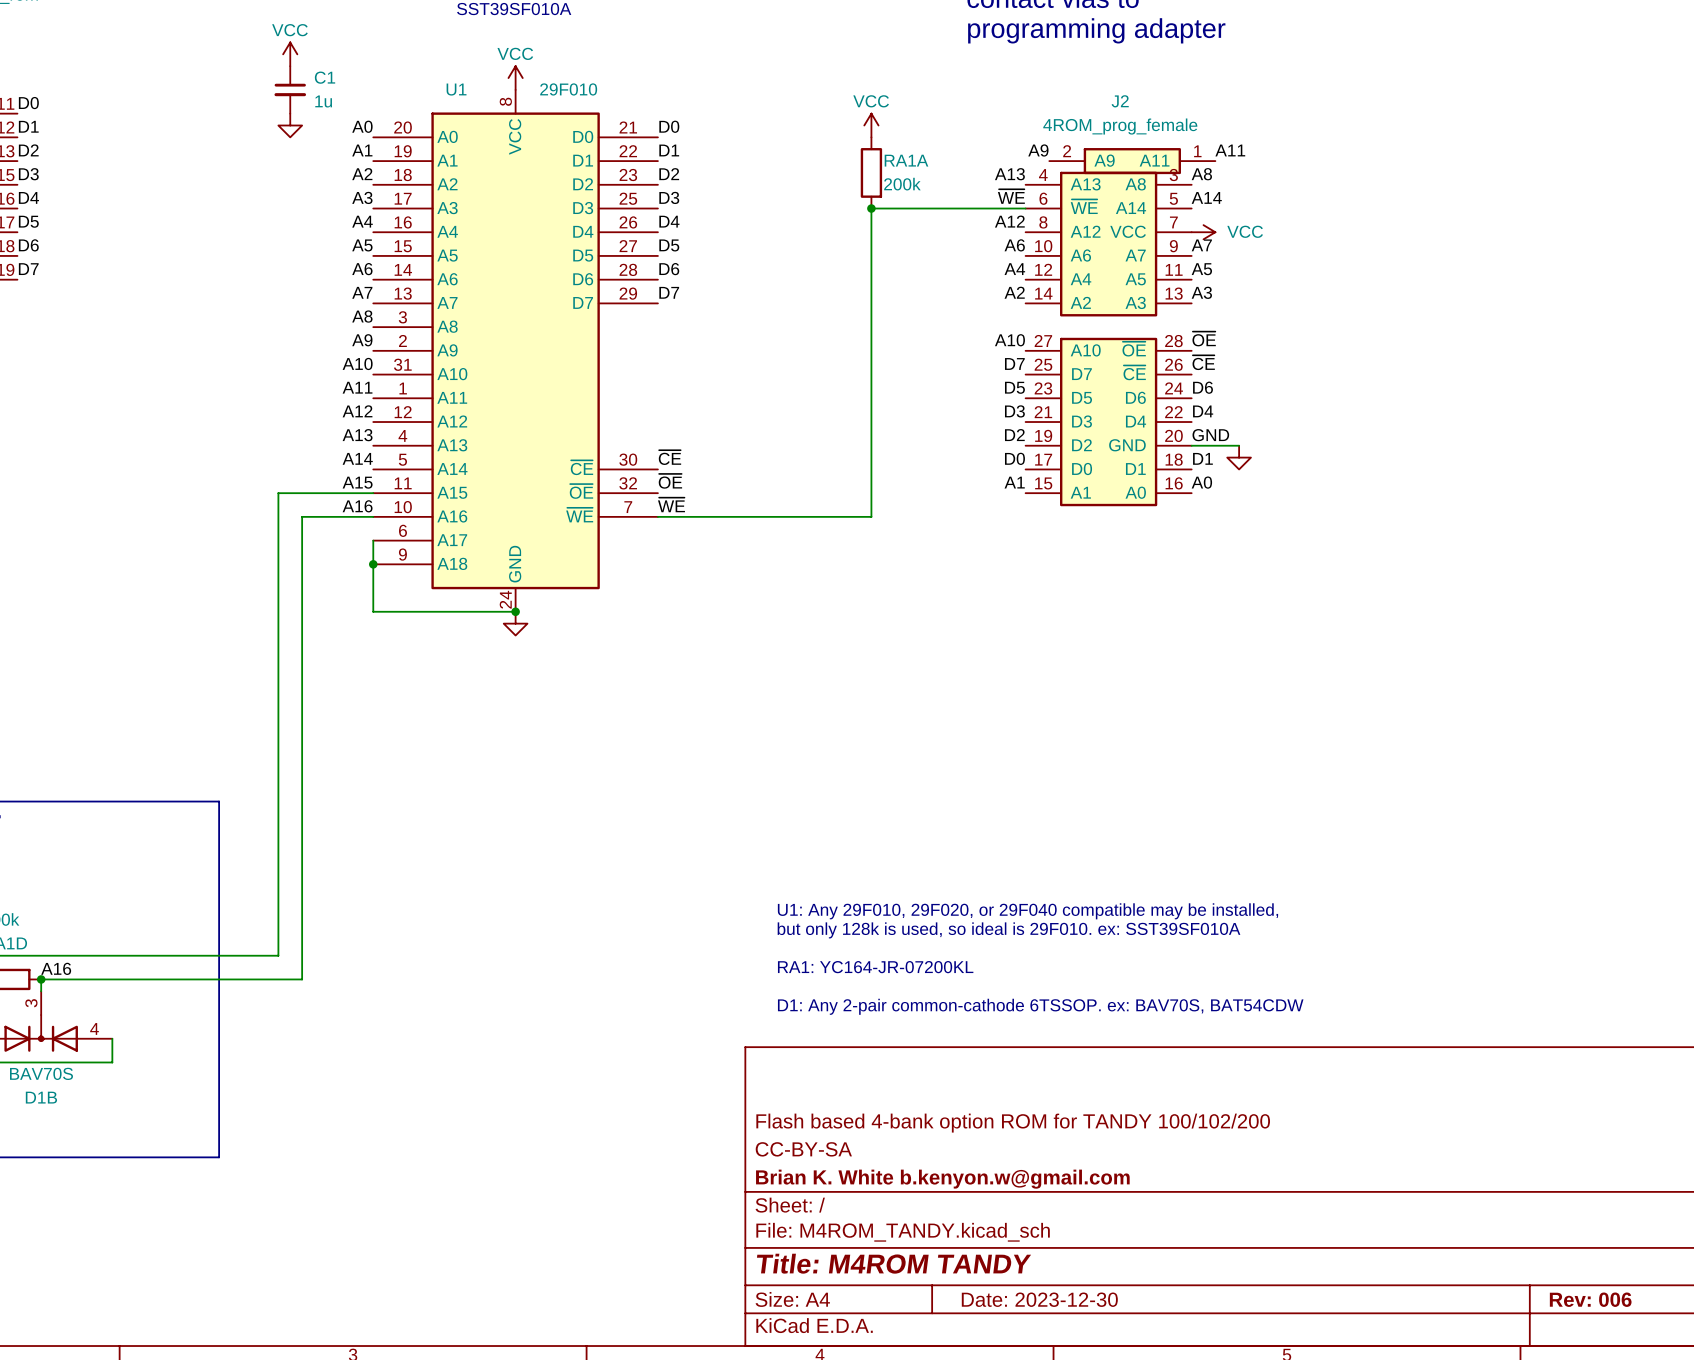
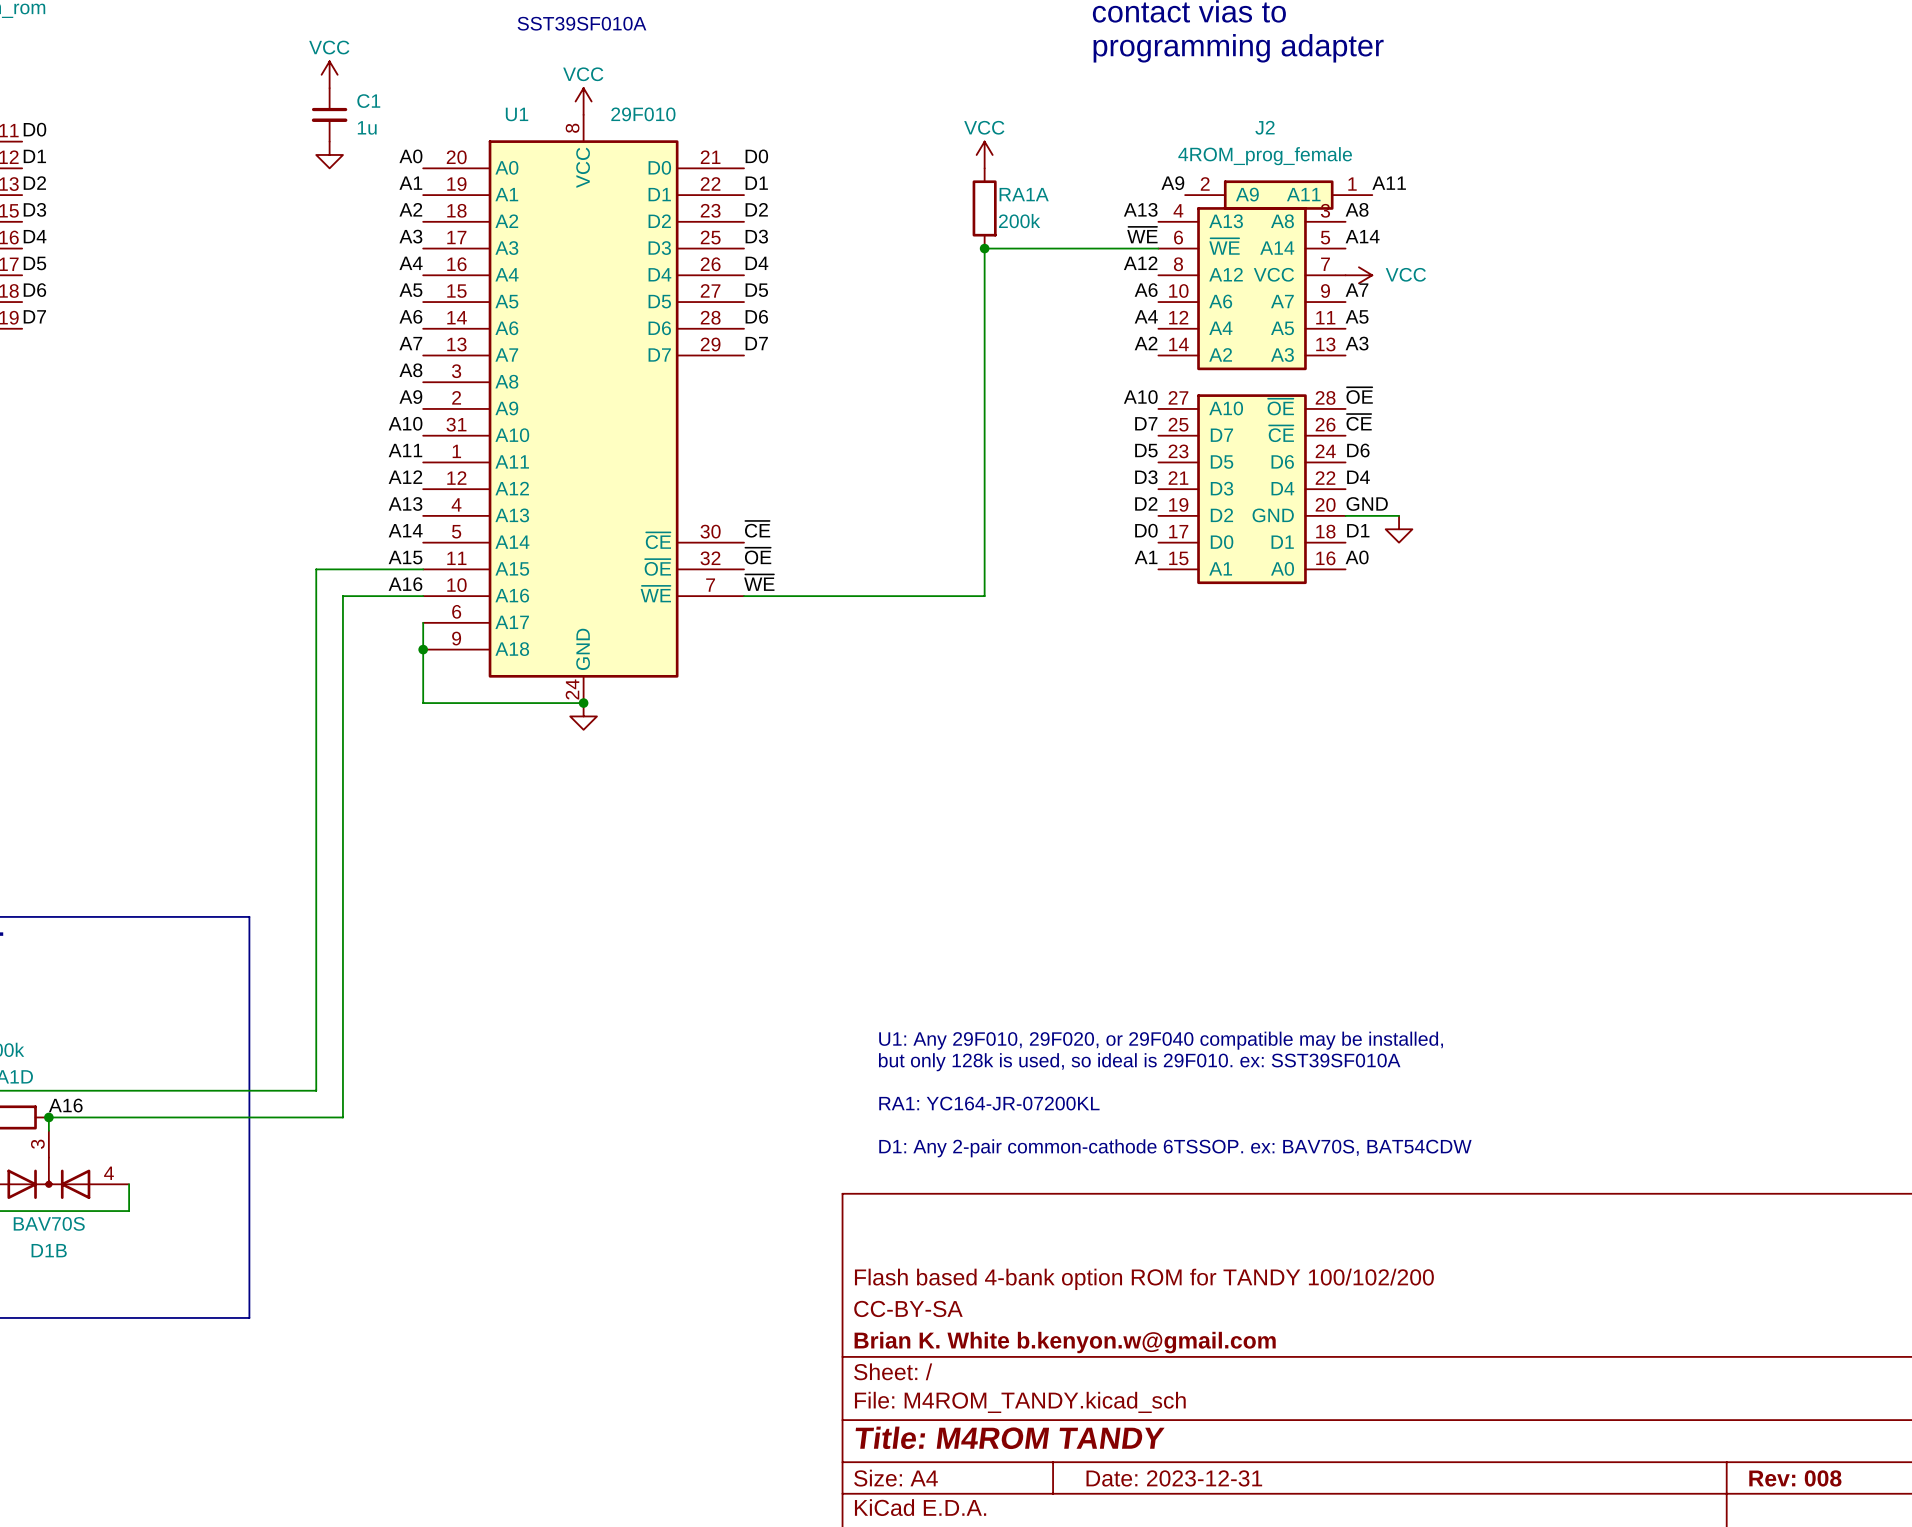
title block: Date: 2023-12-30 (1039, 1299) -> Date: 2023-12-31 (1174, 1478)
title block: Rev: 006 (1590, 1299) -> Rev: 008 (1795, 1478)

